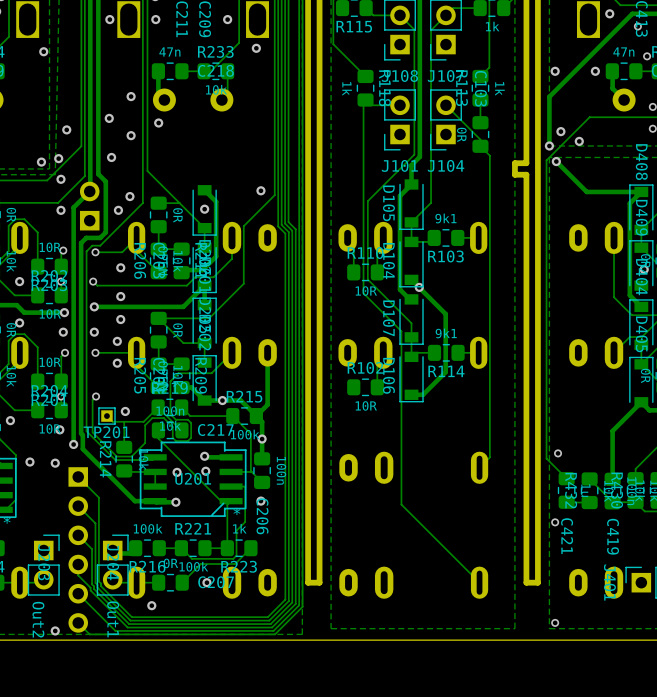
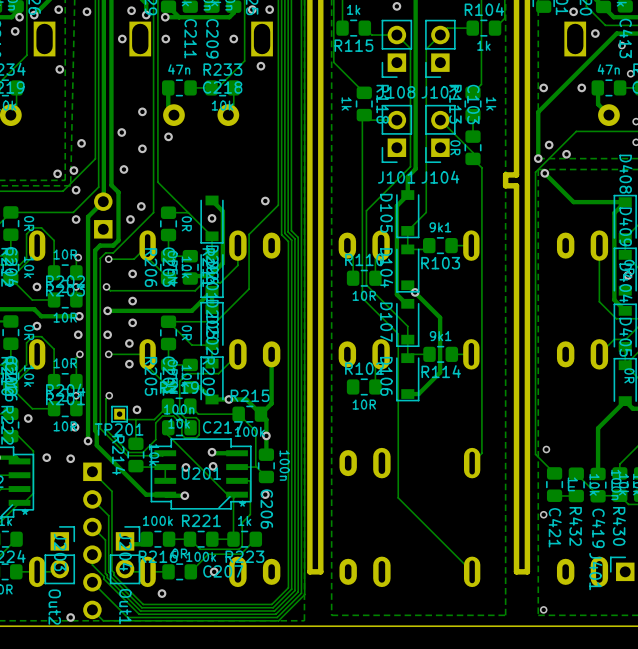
R432 name position: R432 (571, 490) -> R432 (575, 526)
R430 name position: R430 (617, 490) -> R430 (619, 526)

